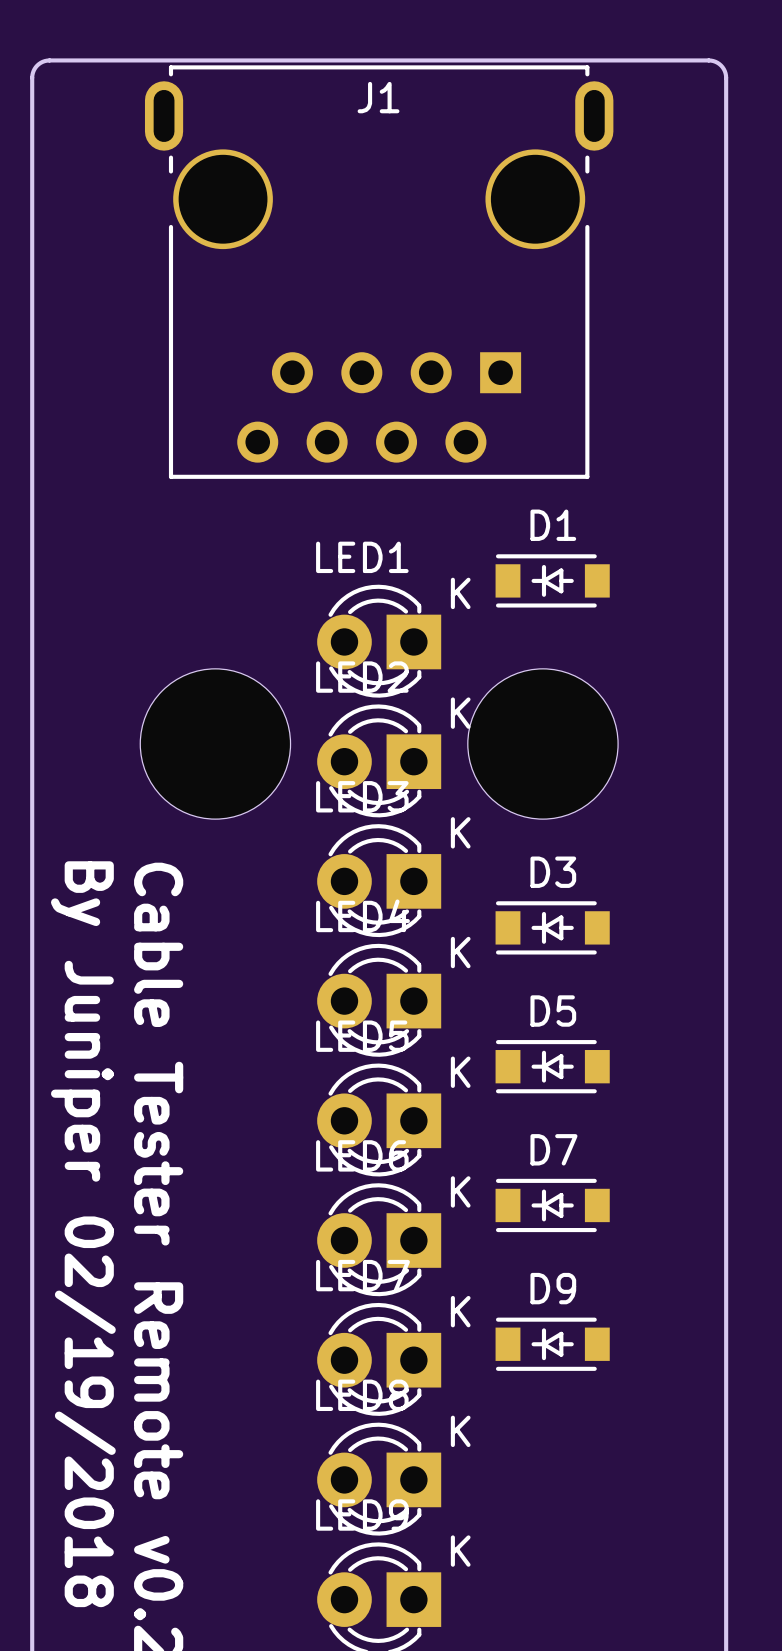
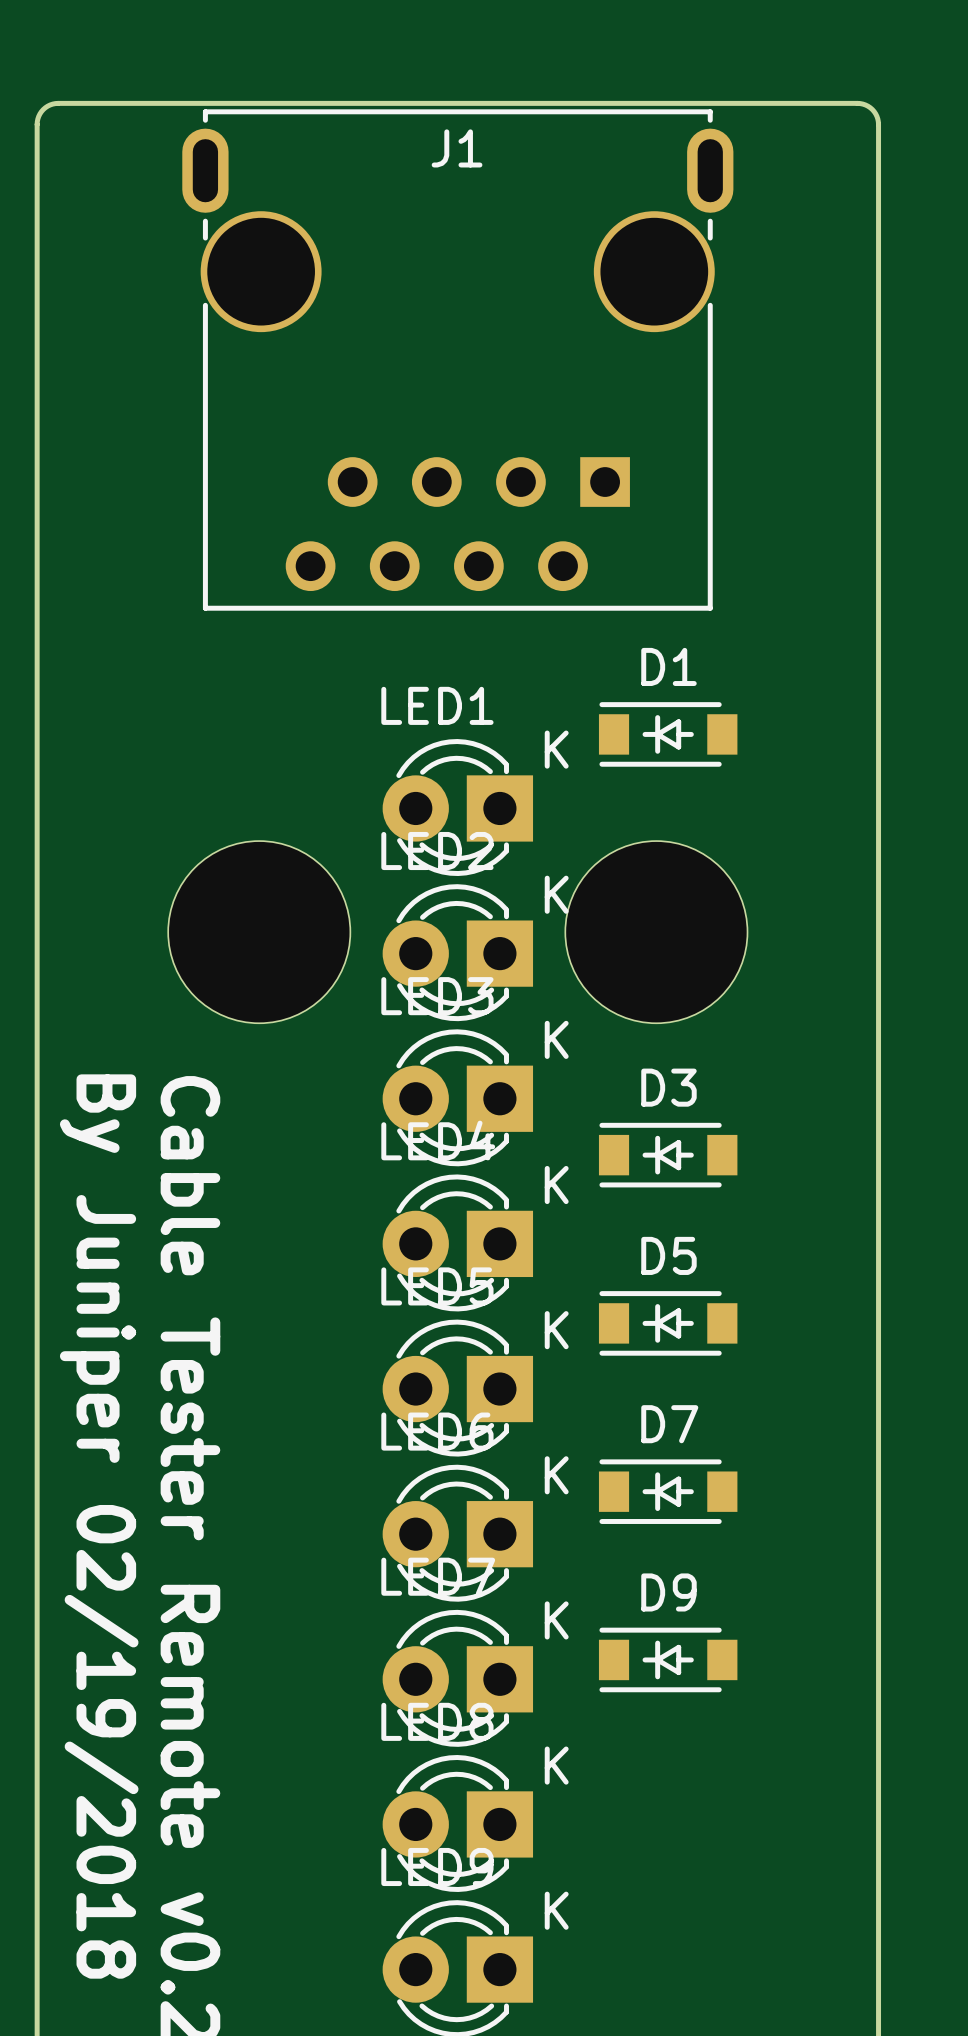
J1 footprint: [144, 65, 614, 479] -> [182, 109, 734, 611]

